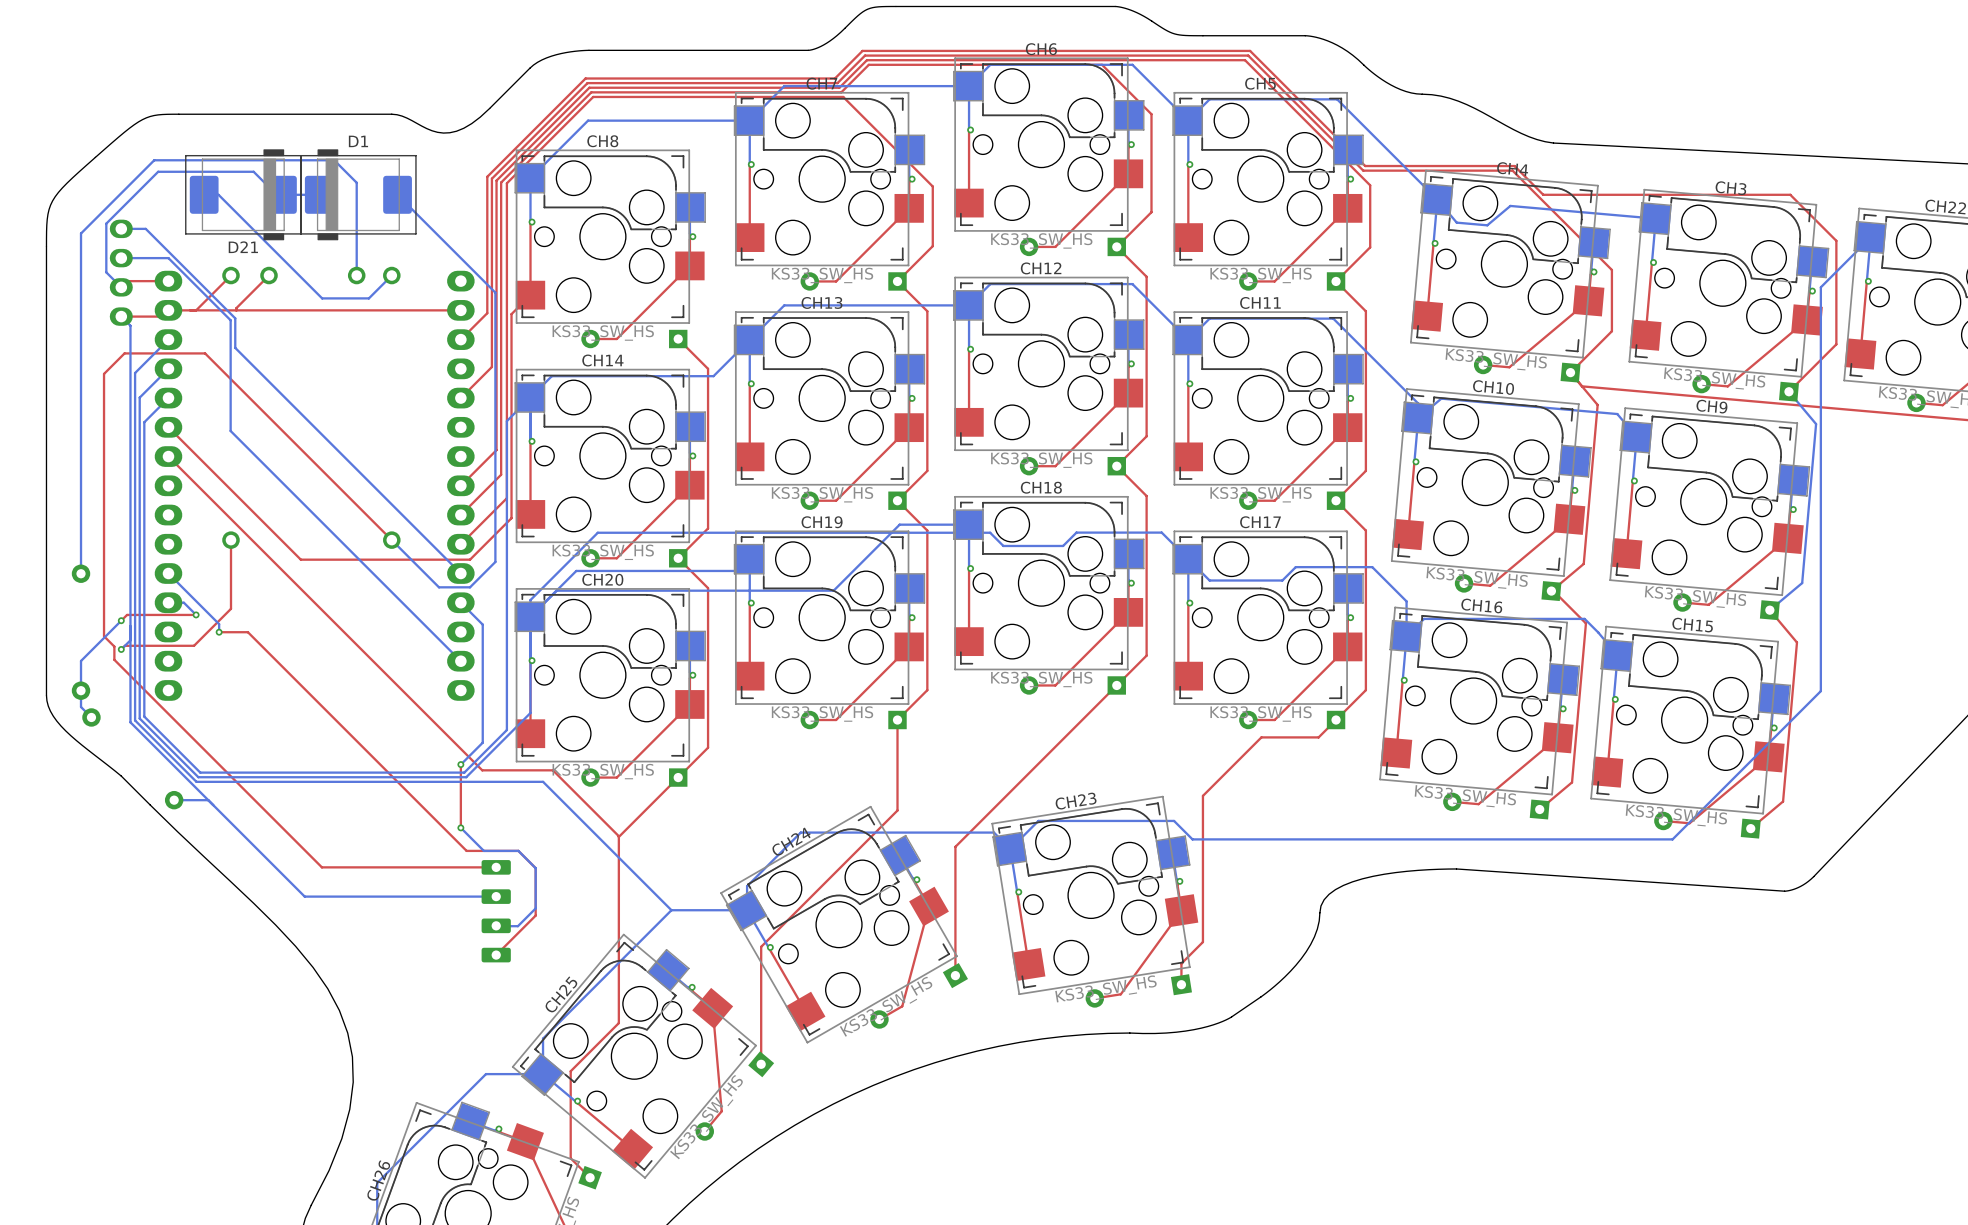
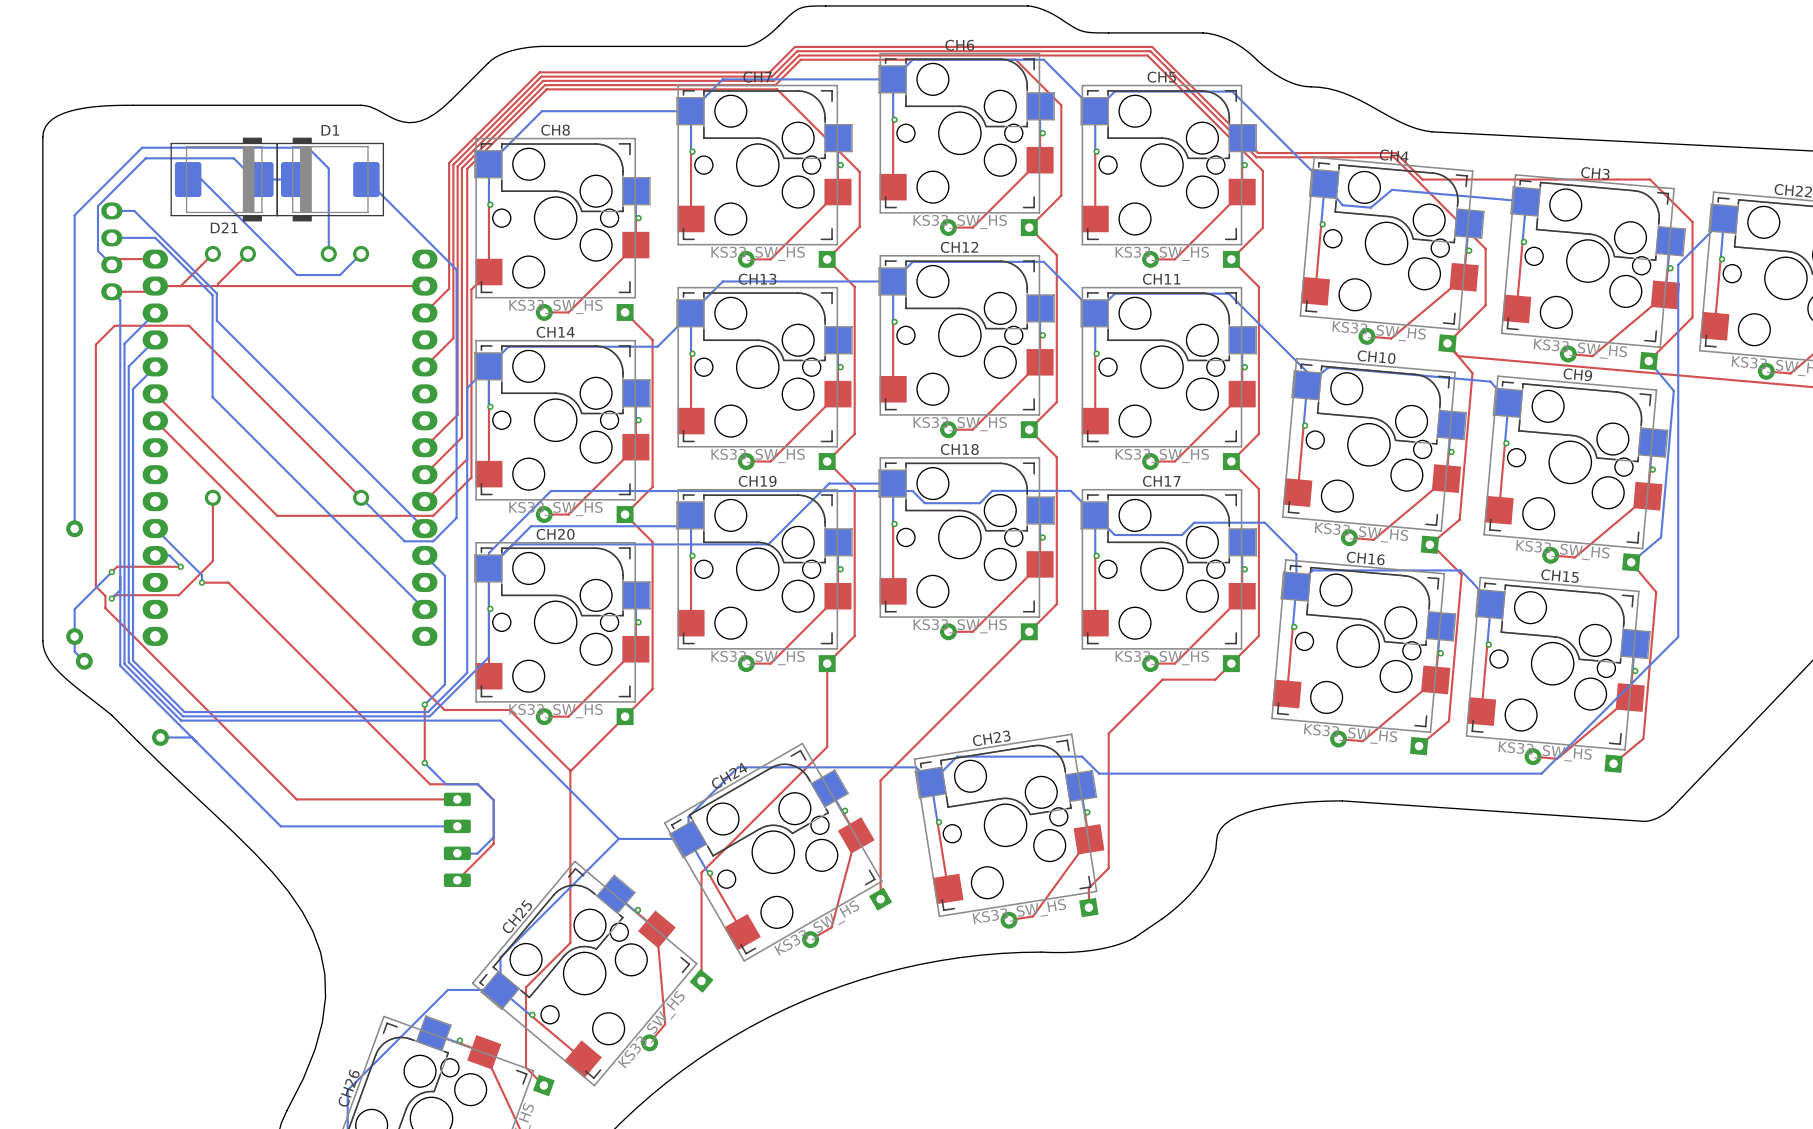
board edge: (178, 114) (154, 115) (138, 121) (67, 183) (55, 196) (49, 209) (46, 246) -> (164, 105) (85, 107) (64, 113) (48, 122) (42, 137) (42, 227)

